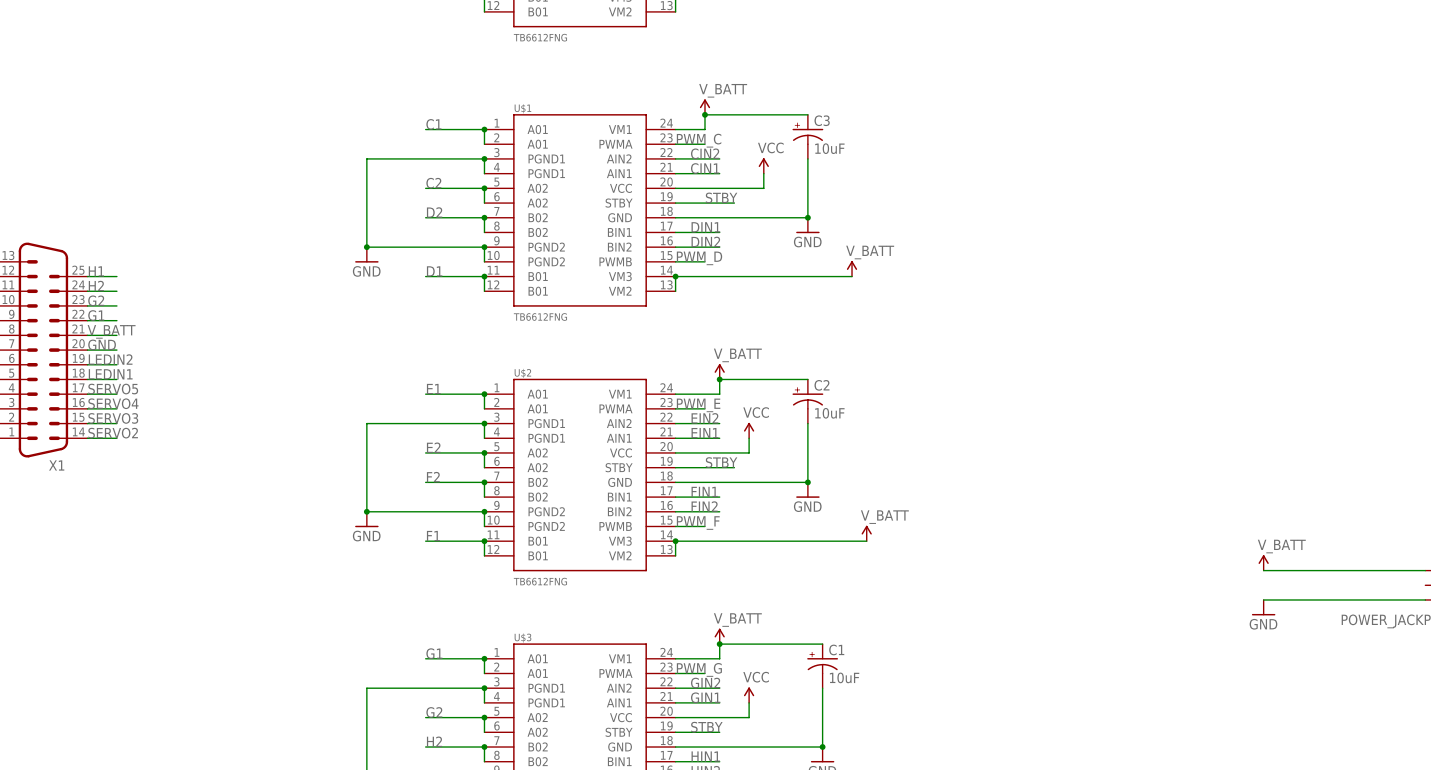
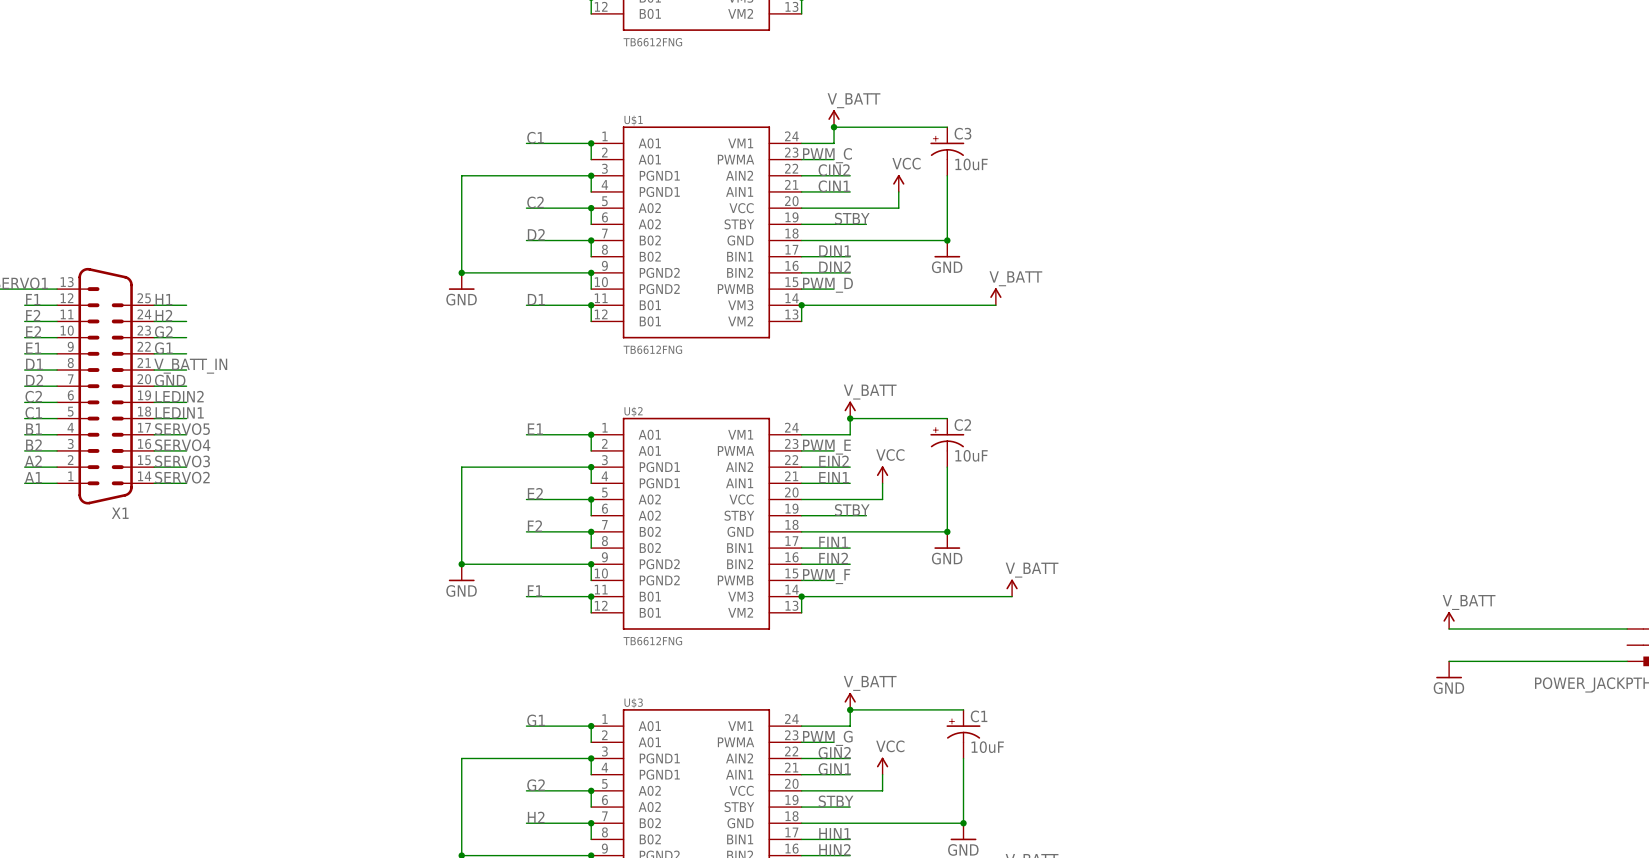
label: V_BATT (111, 331) -> V_BATT_IN (190, 366)

